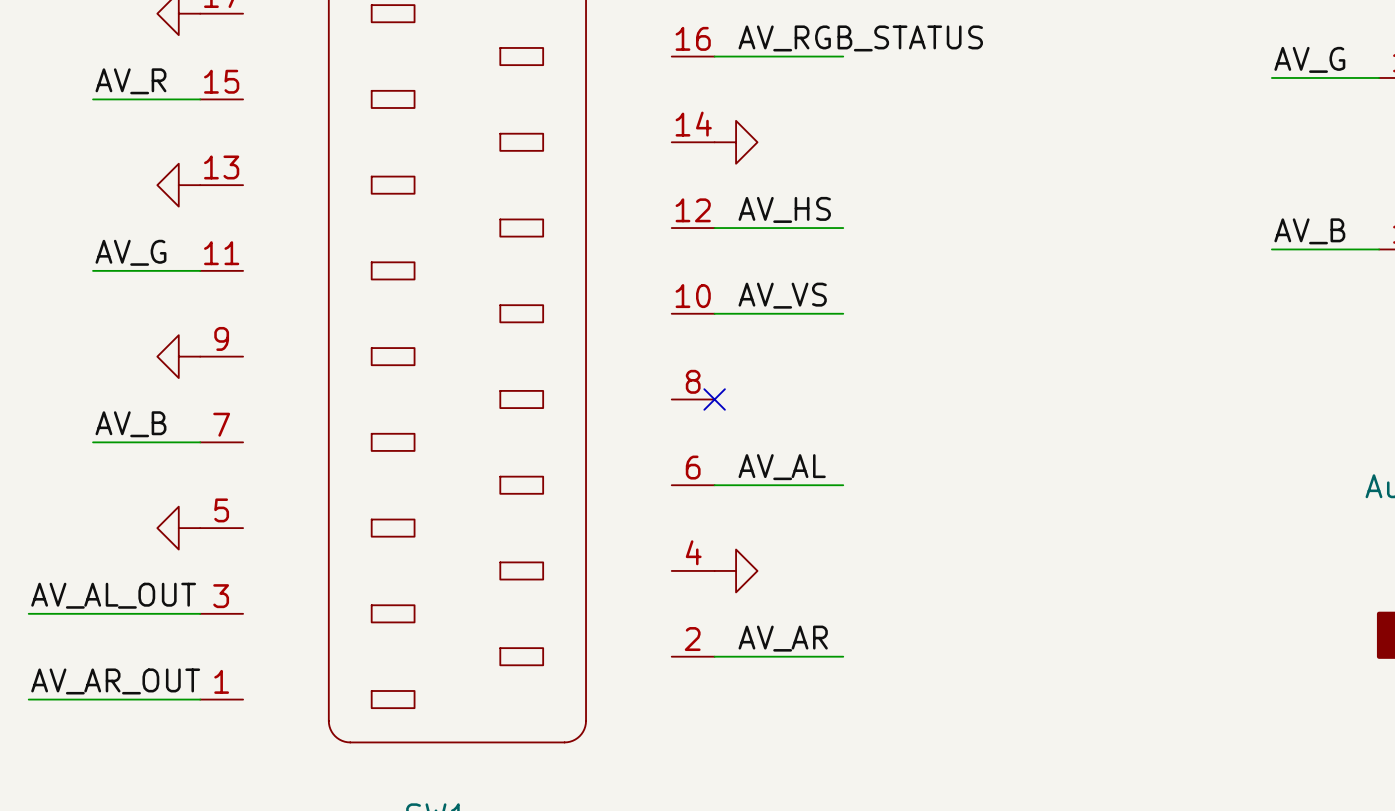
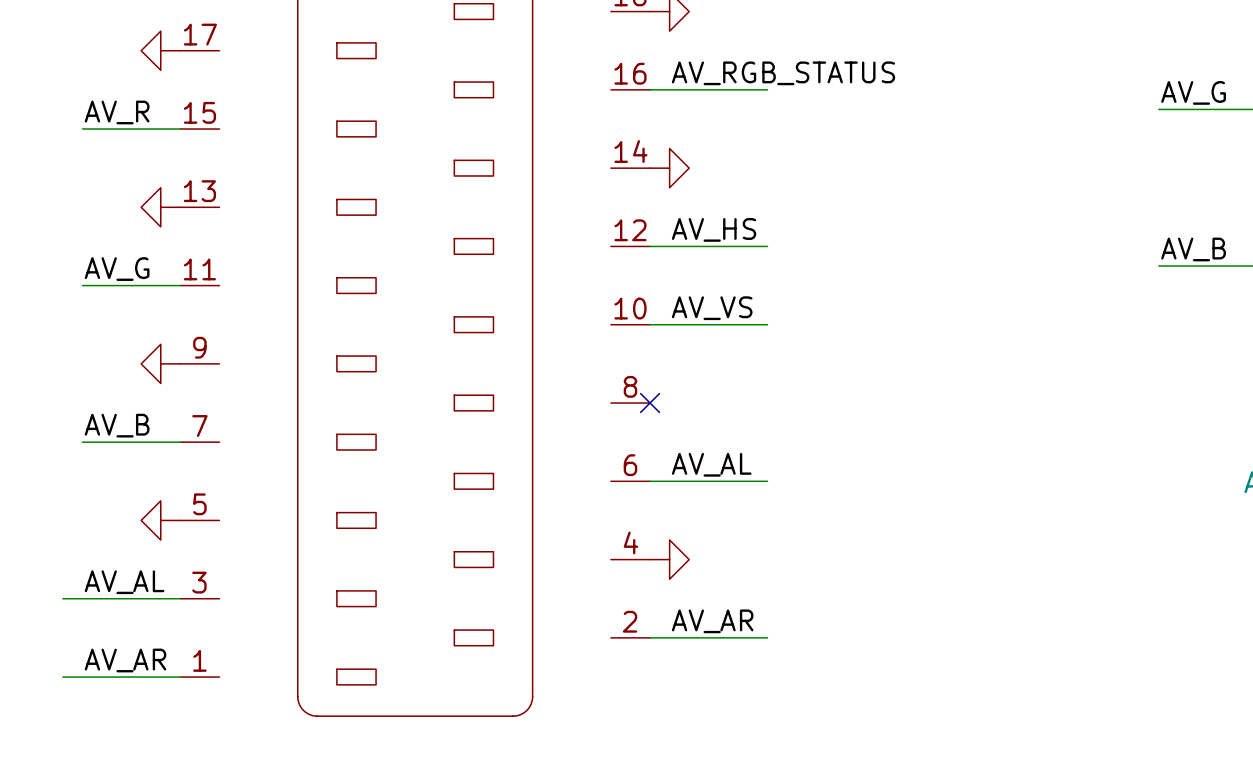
label: AV_AL_OUT (113, 595) -> AV_AL (124, 582)
wire: (28, 613) (71, 613) -> none
label: AV_AR_OUT (115, 681) -> AV_AR (125, 660)
wire: (28, 699) (71, 699) -> none

